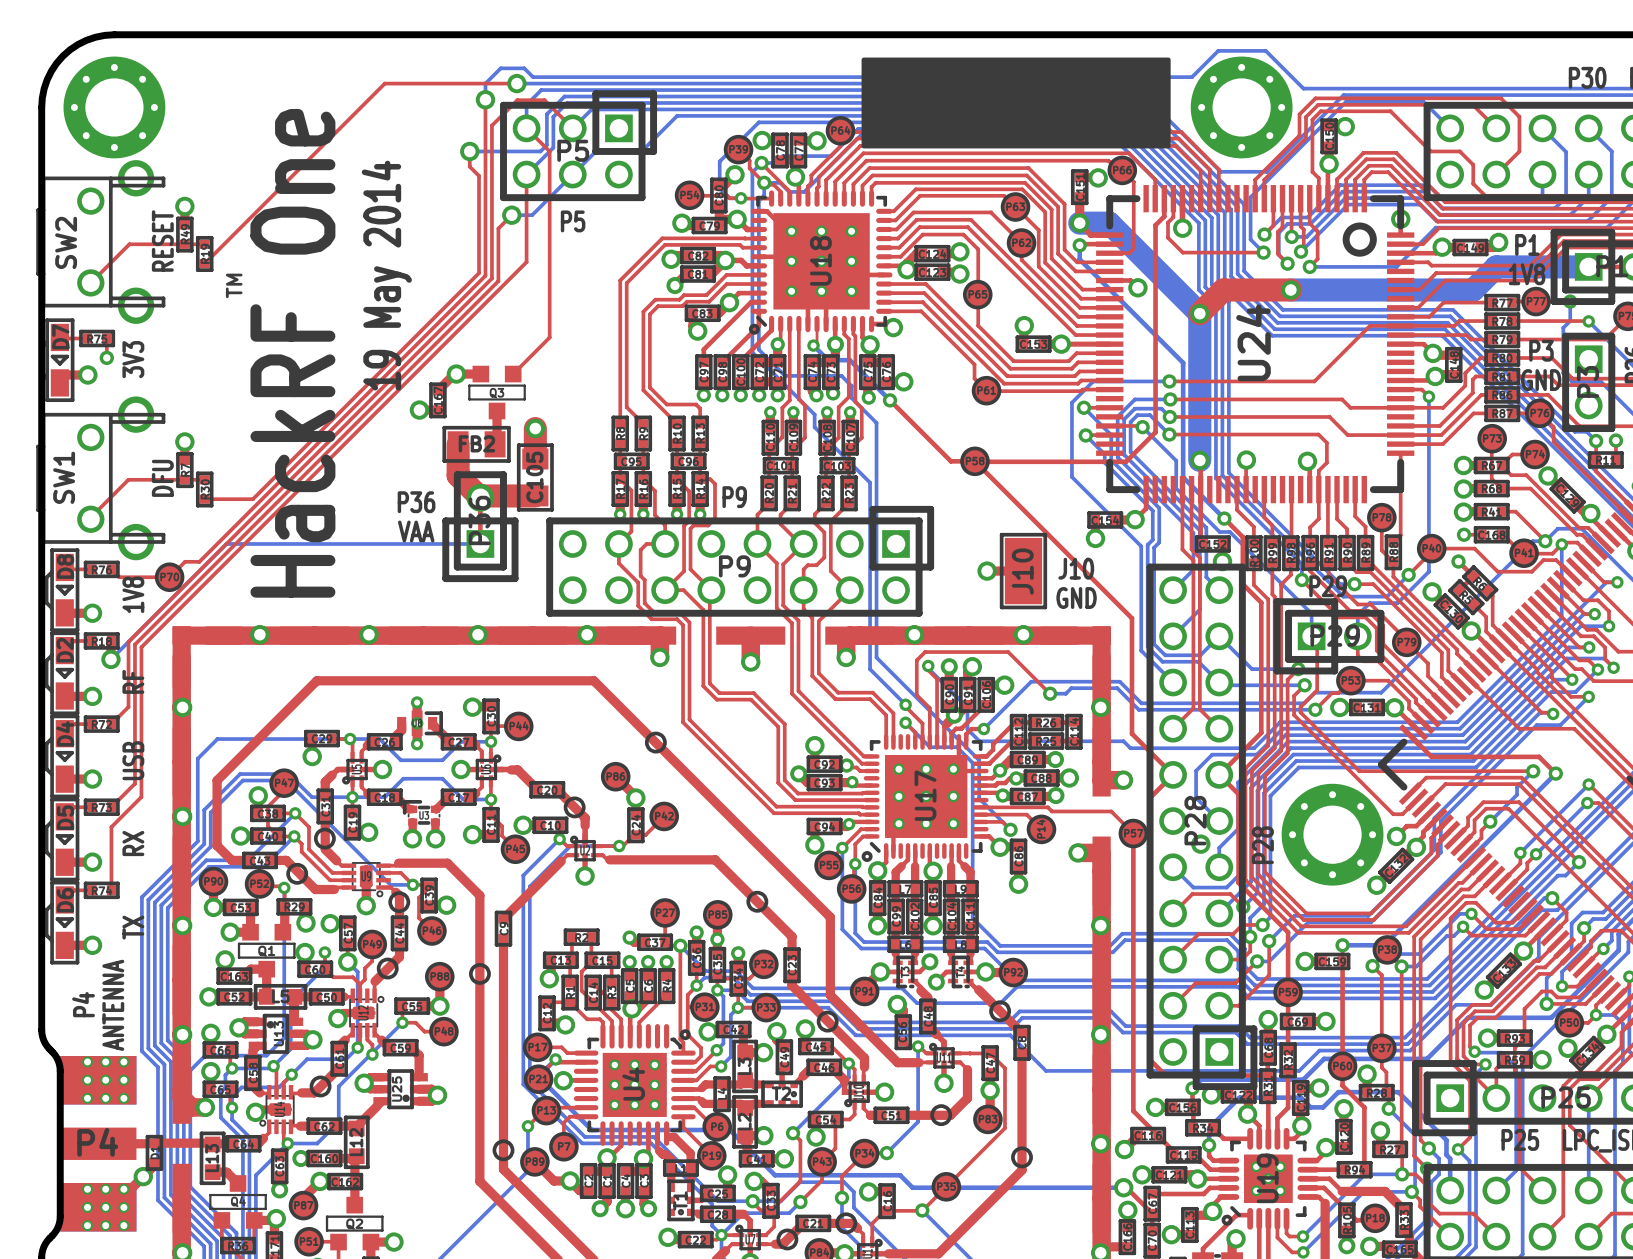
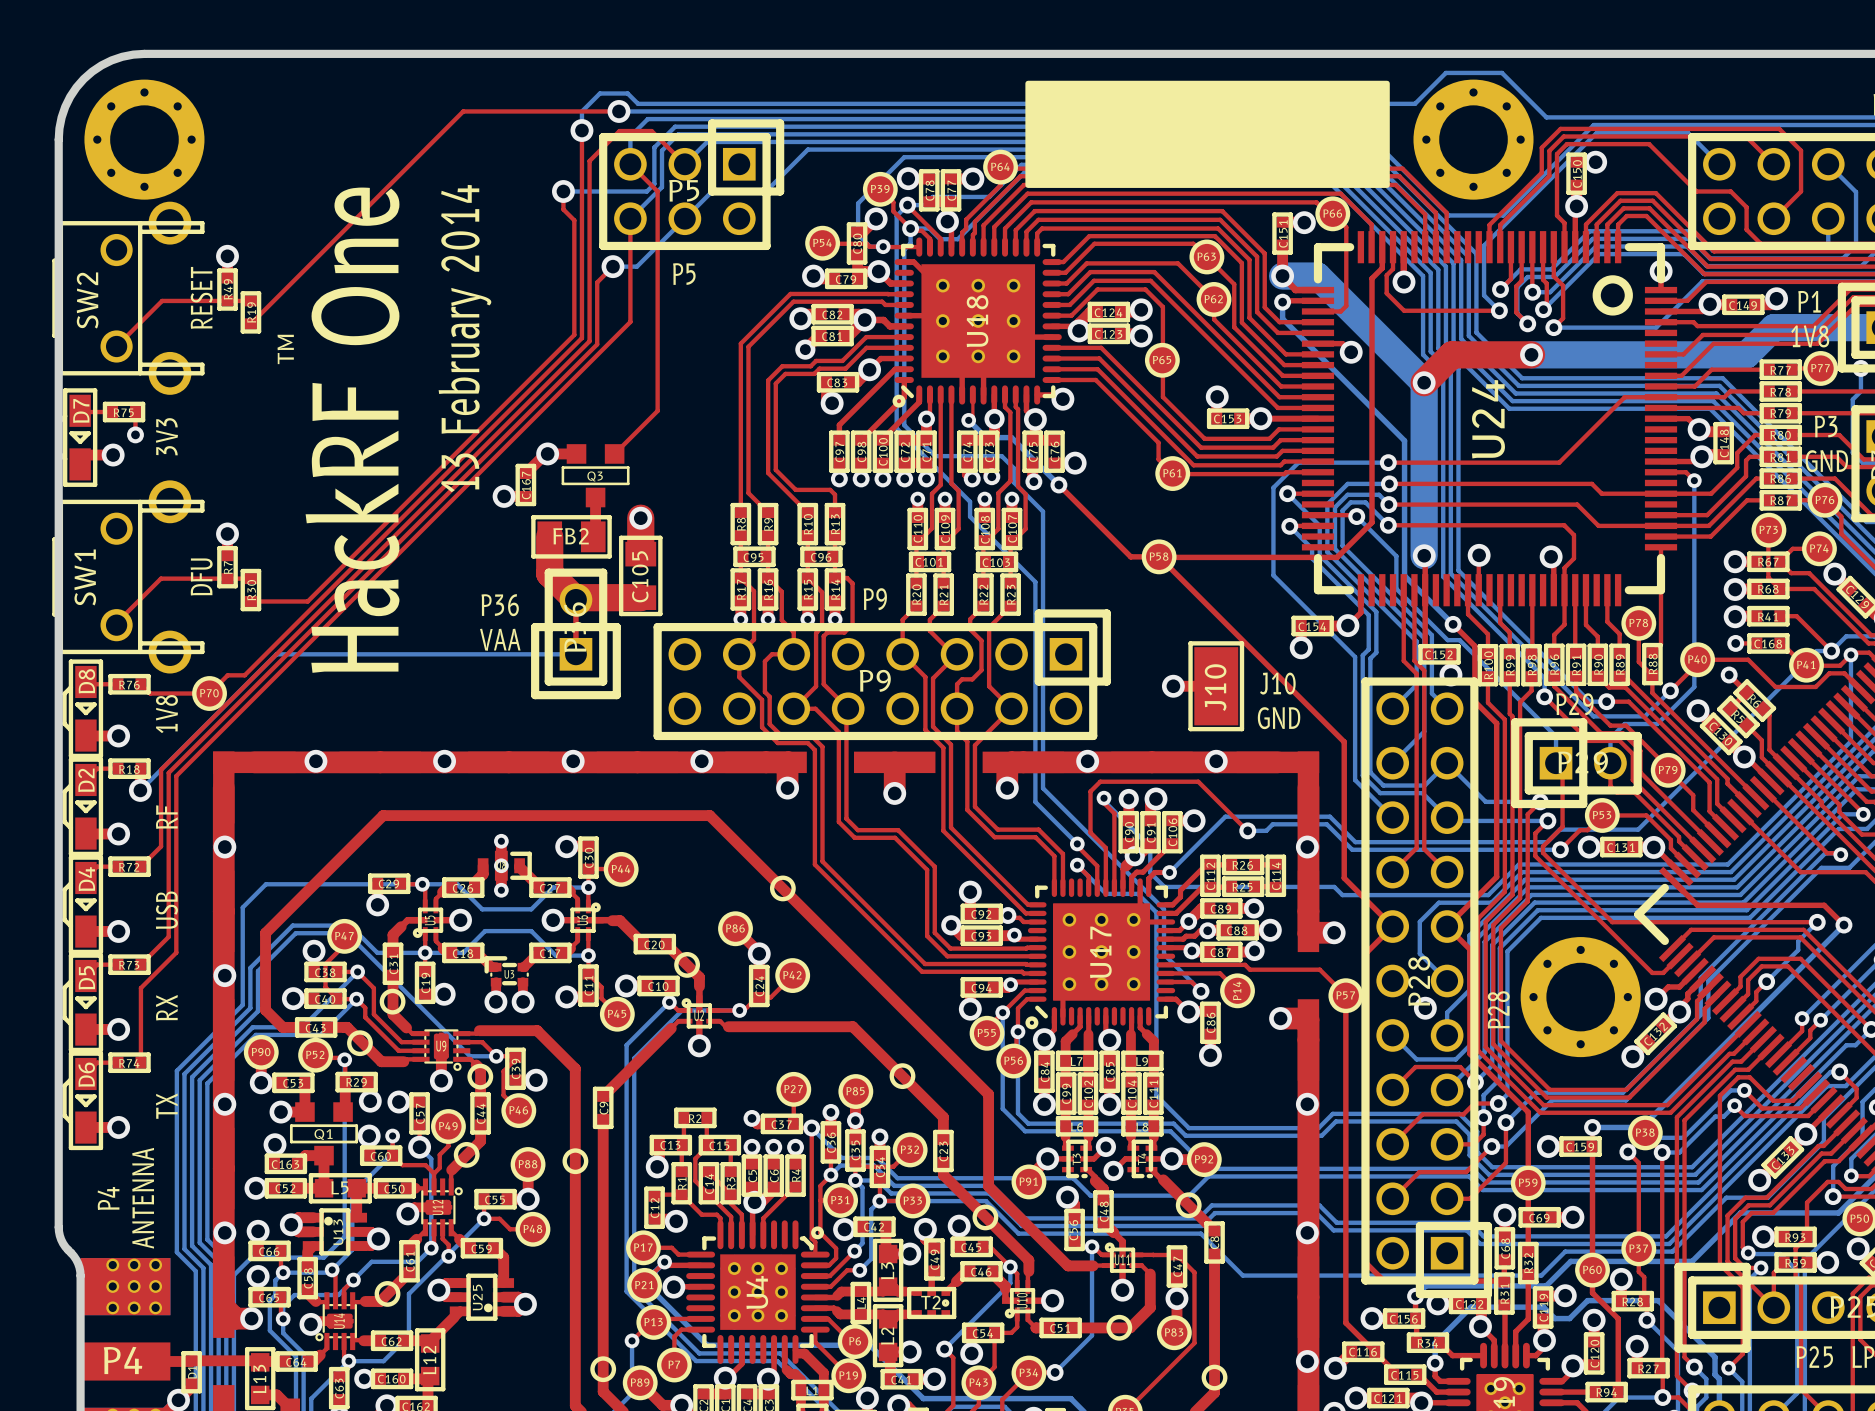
text: 19 May 2014 (386, 275) -> 13 February 2014 (464, 338)

